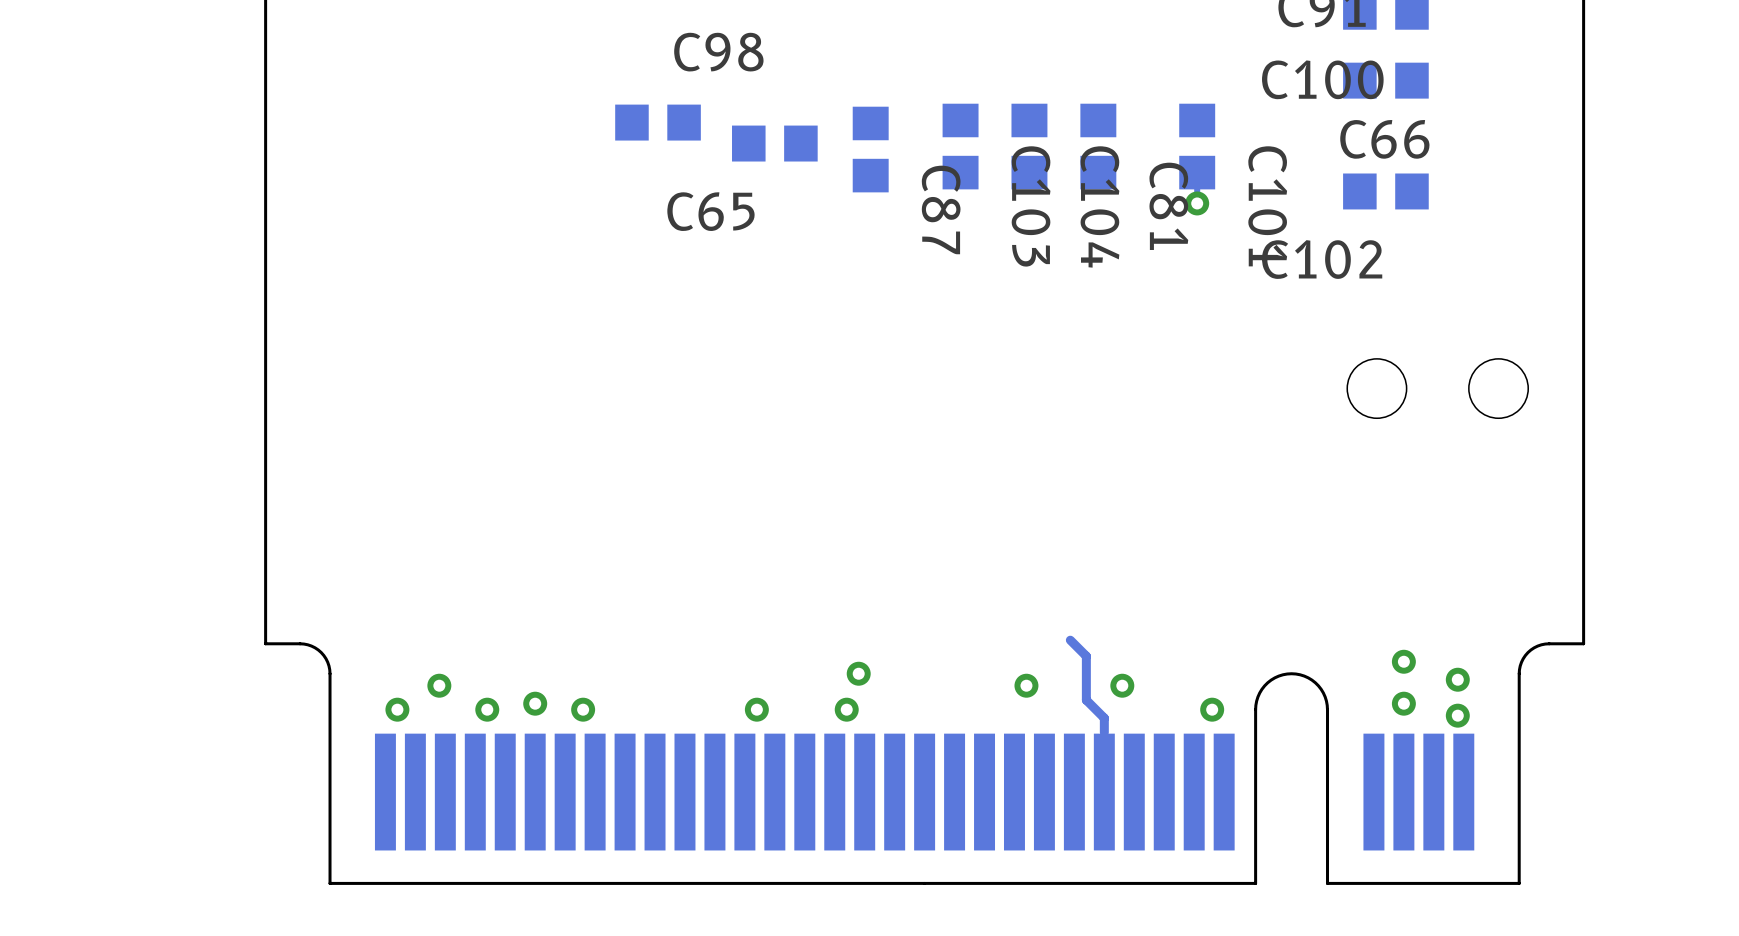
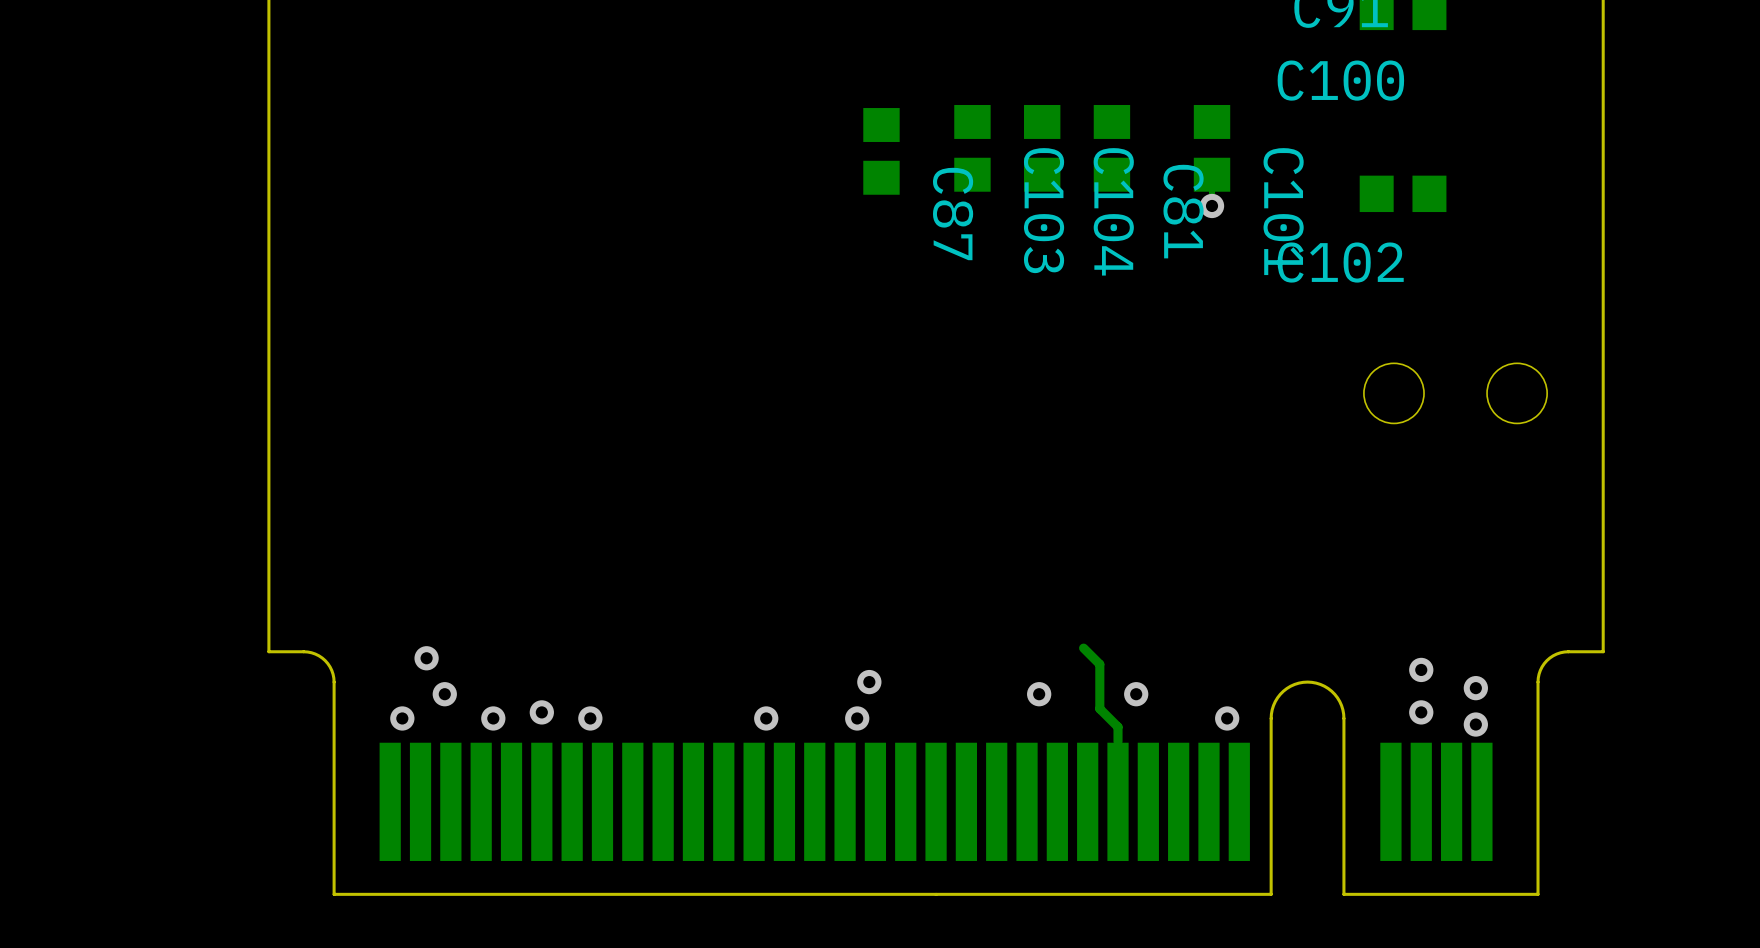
C66: (1385, 80) -> none
C98: (658, 122) -> none
C65: (774, 143) -> none
via: none -> (426, 658)

